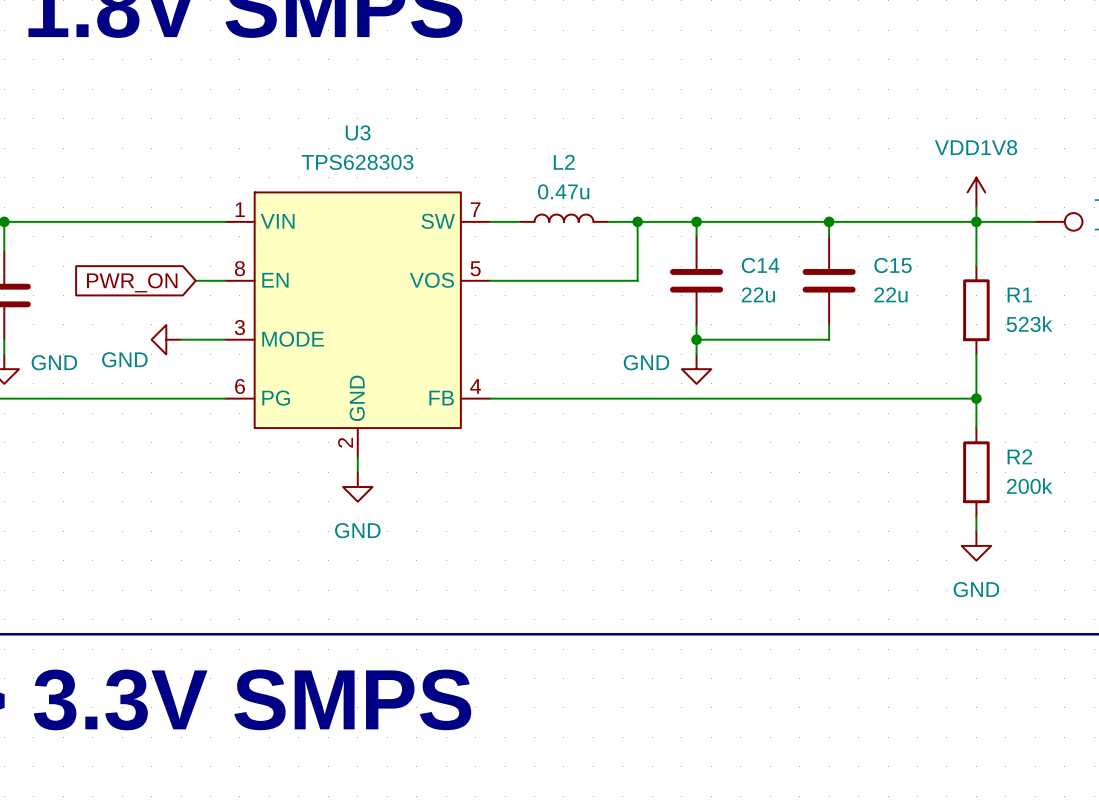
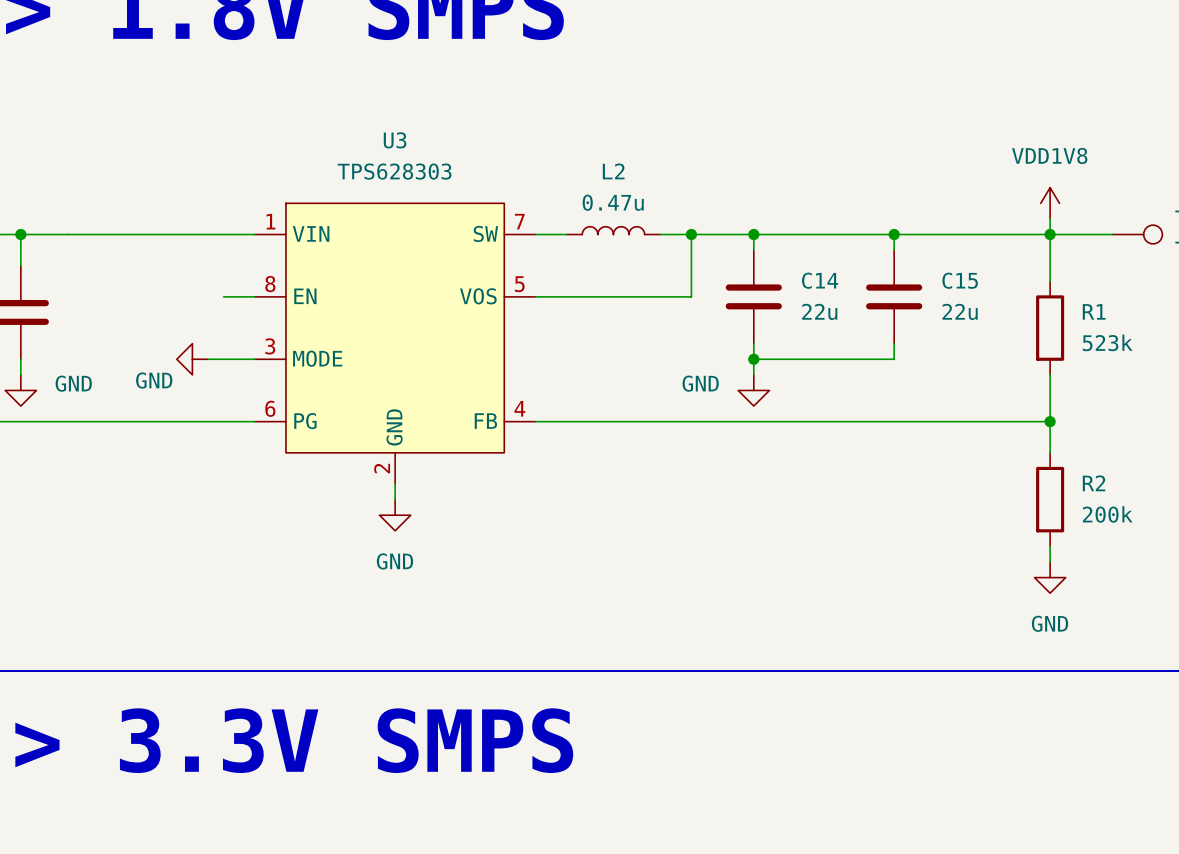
global label: PWR_ON (132, 282) -> none

